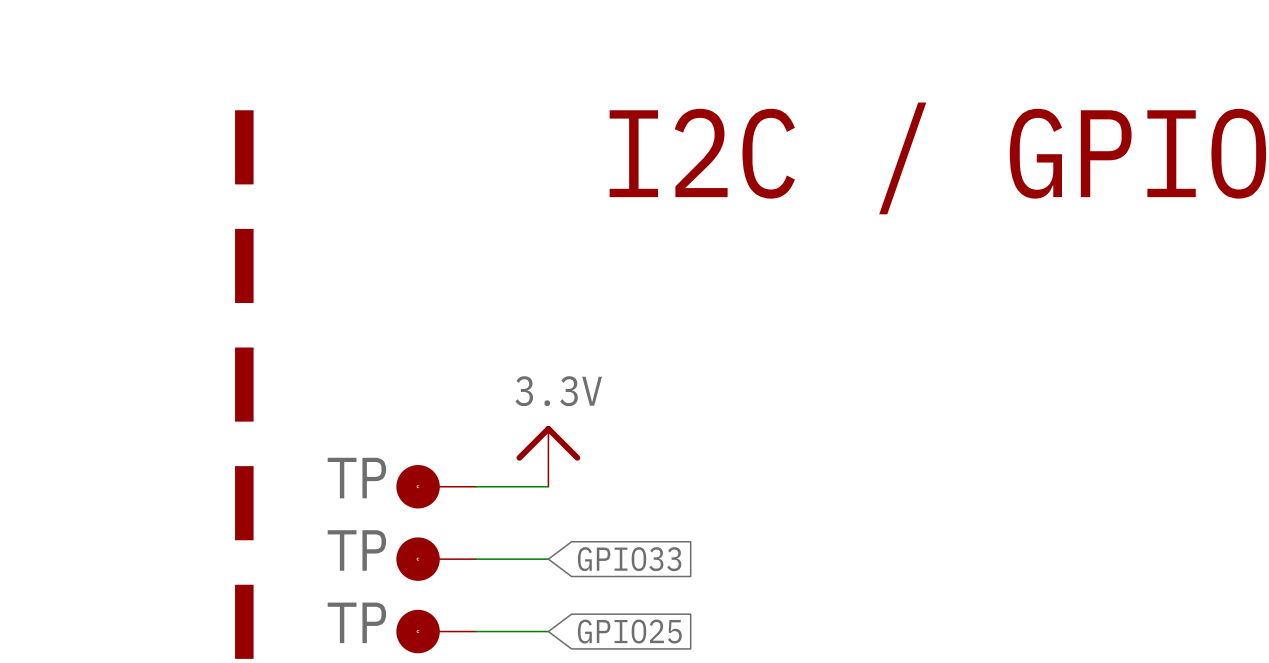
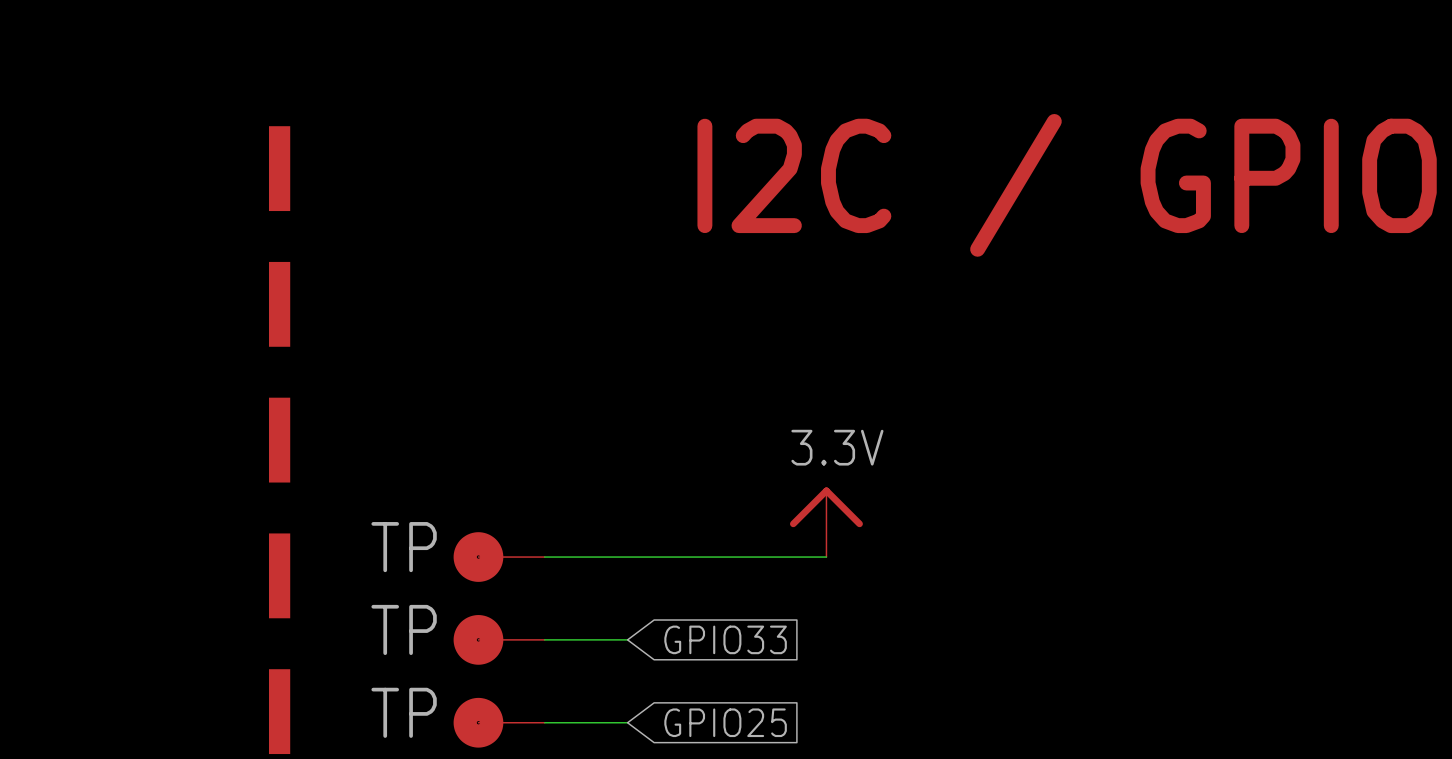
power symbol position: 3.3V (548, 456) -> 3.3V (826, 522)
wire: none -> (627, 557) (826, 557)

